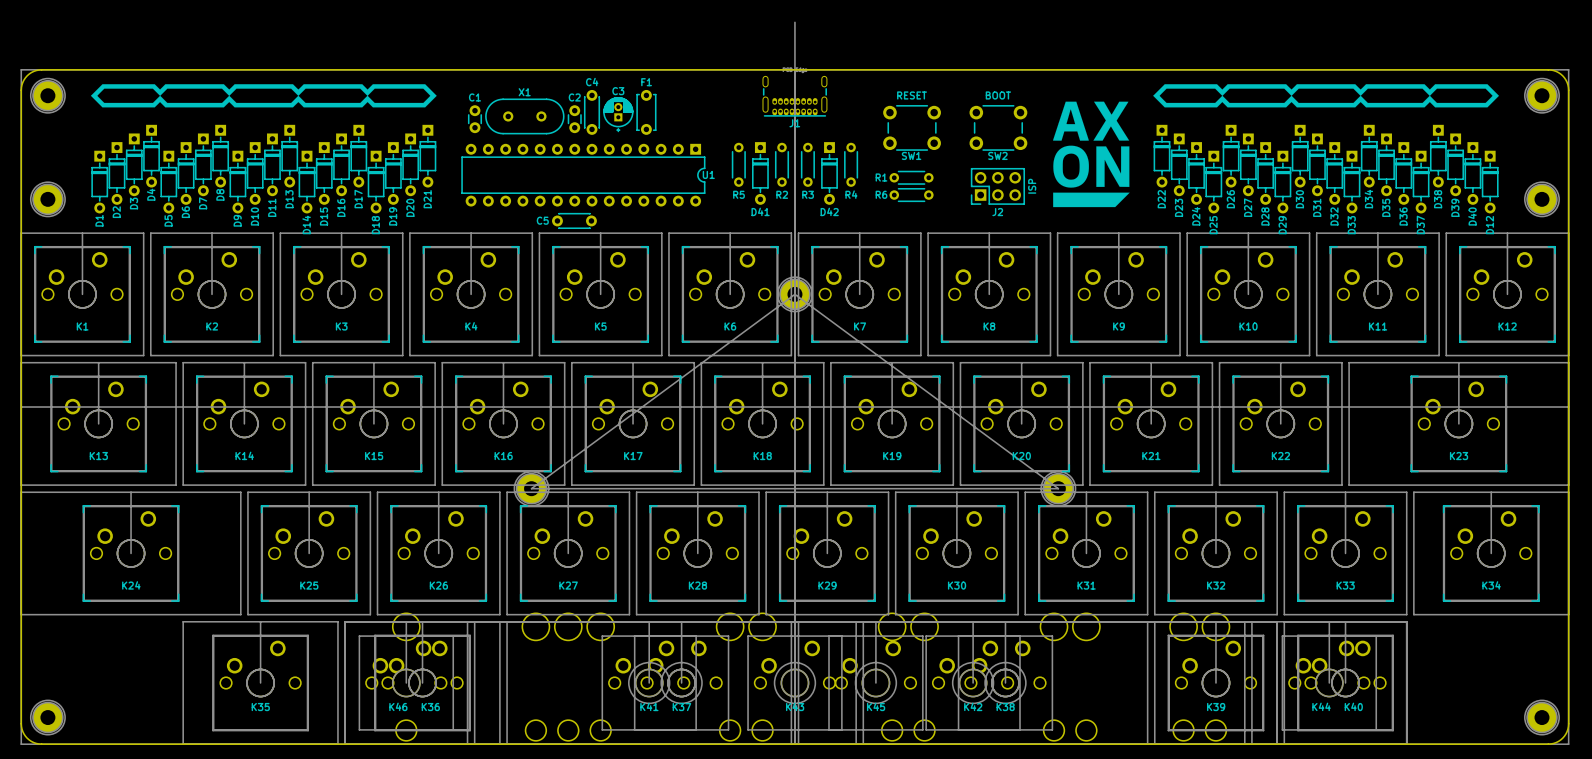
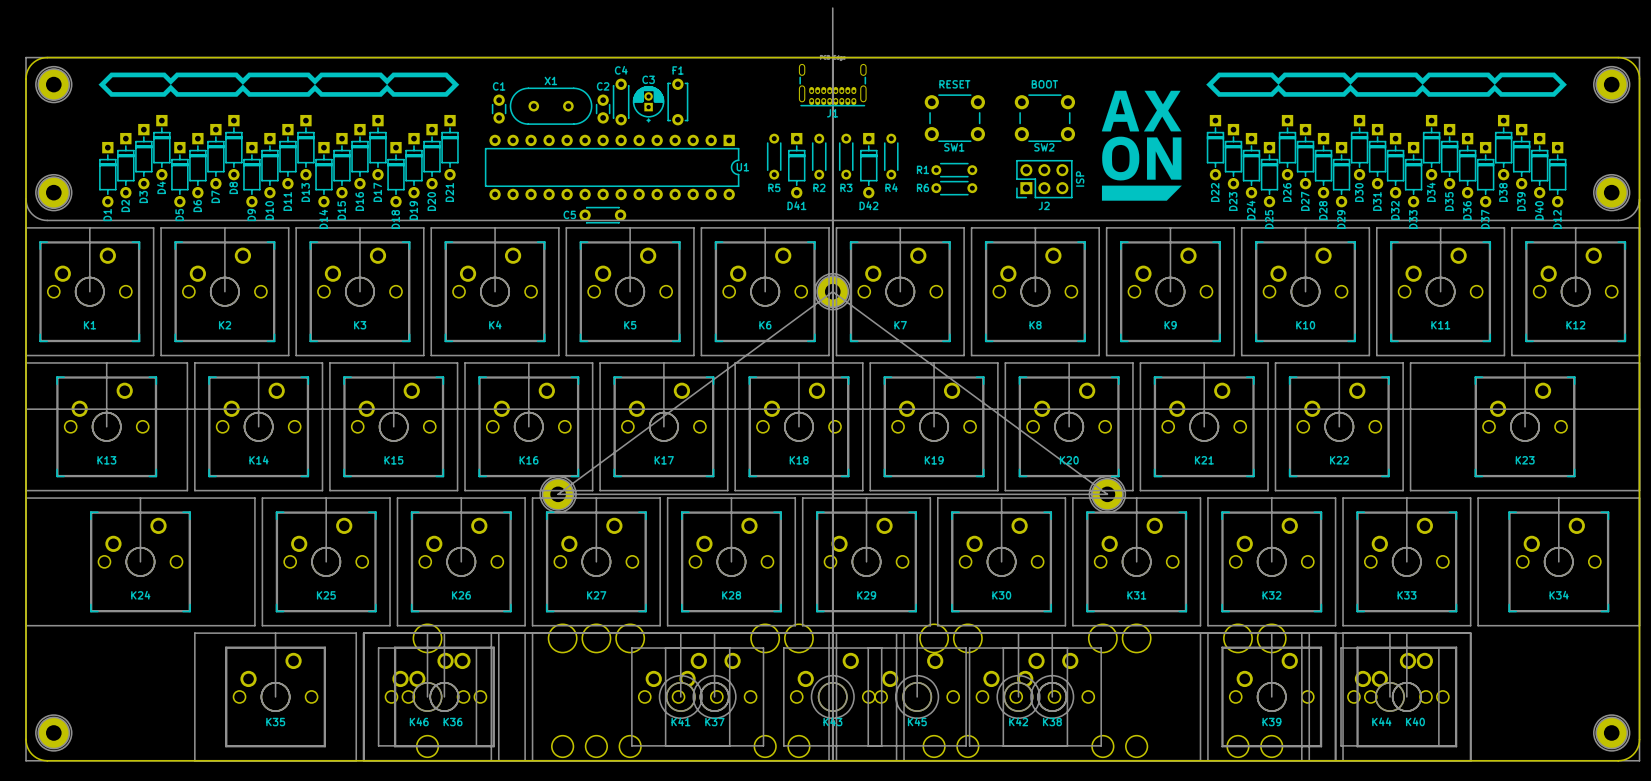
line: none -> (26, 199) (27, 207) (32, 214) (39, 218) (47, 220) (1618, 220) (1626, 218) (1633, 214) (1637, 207) (1639, 199)

